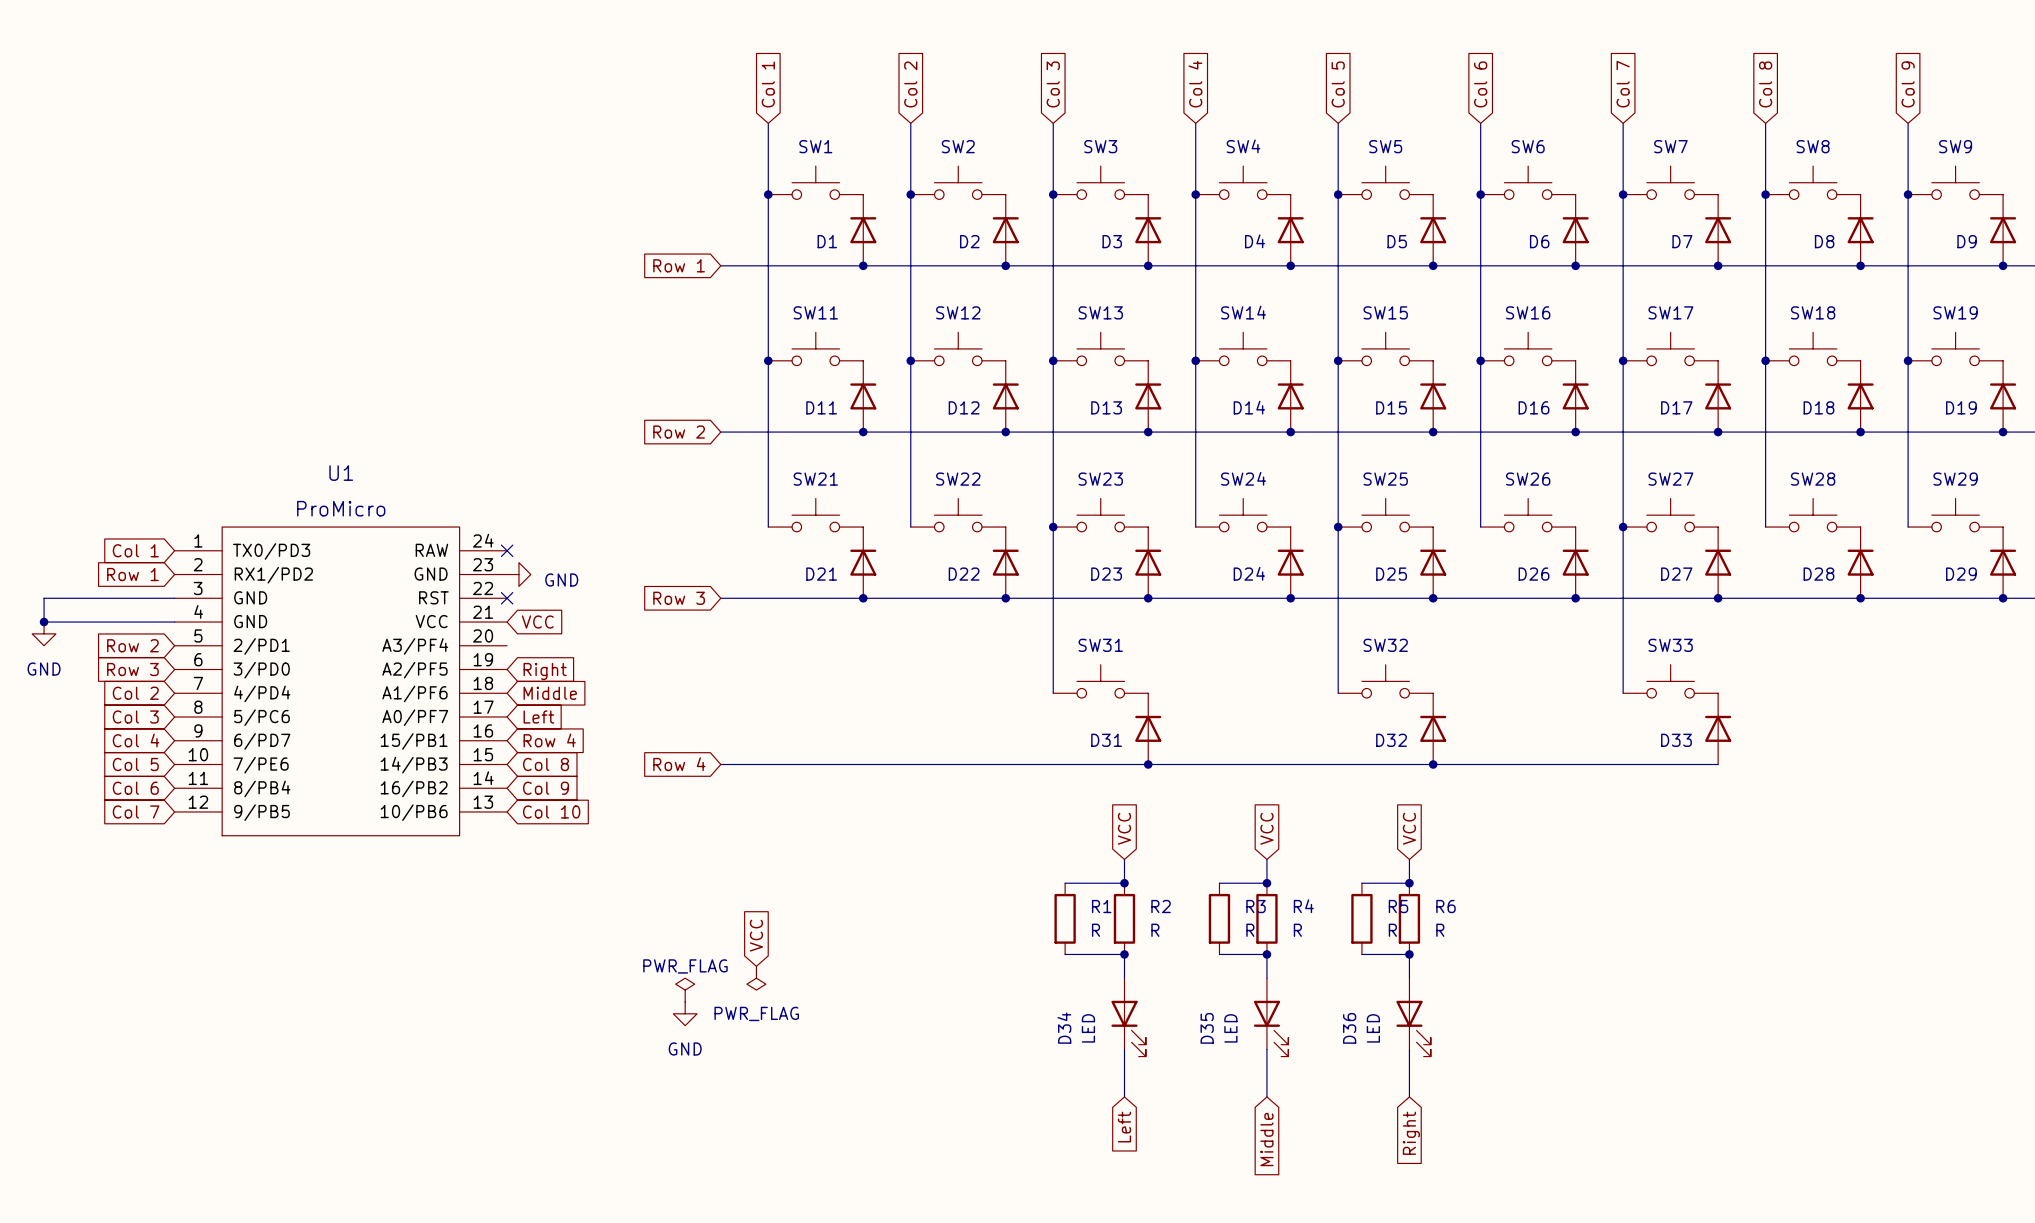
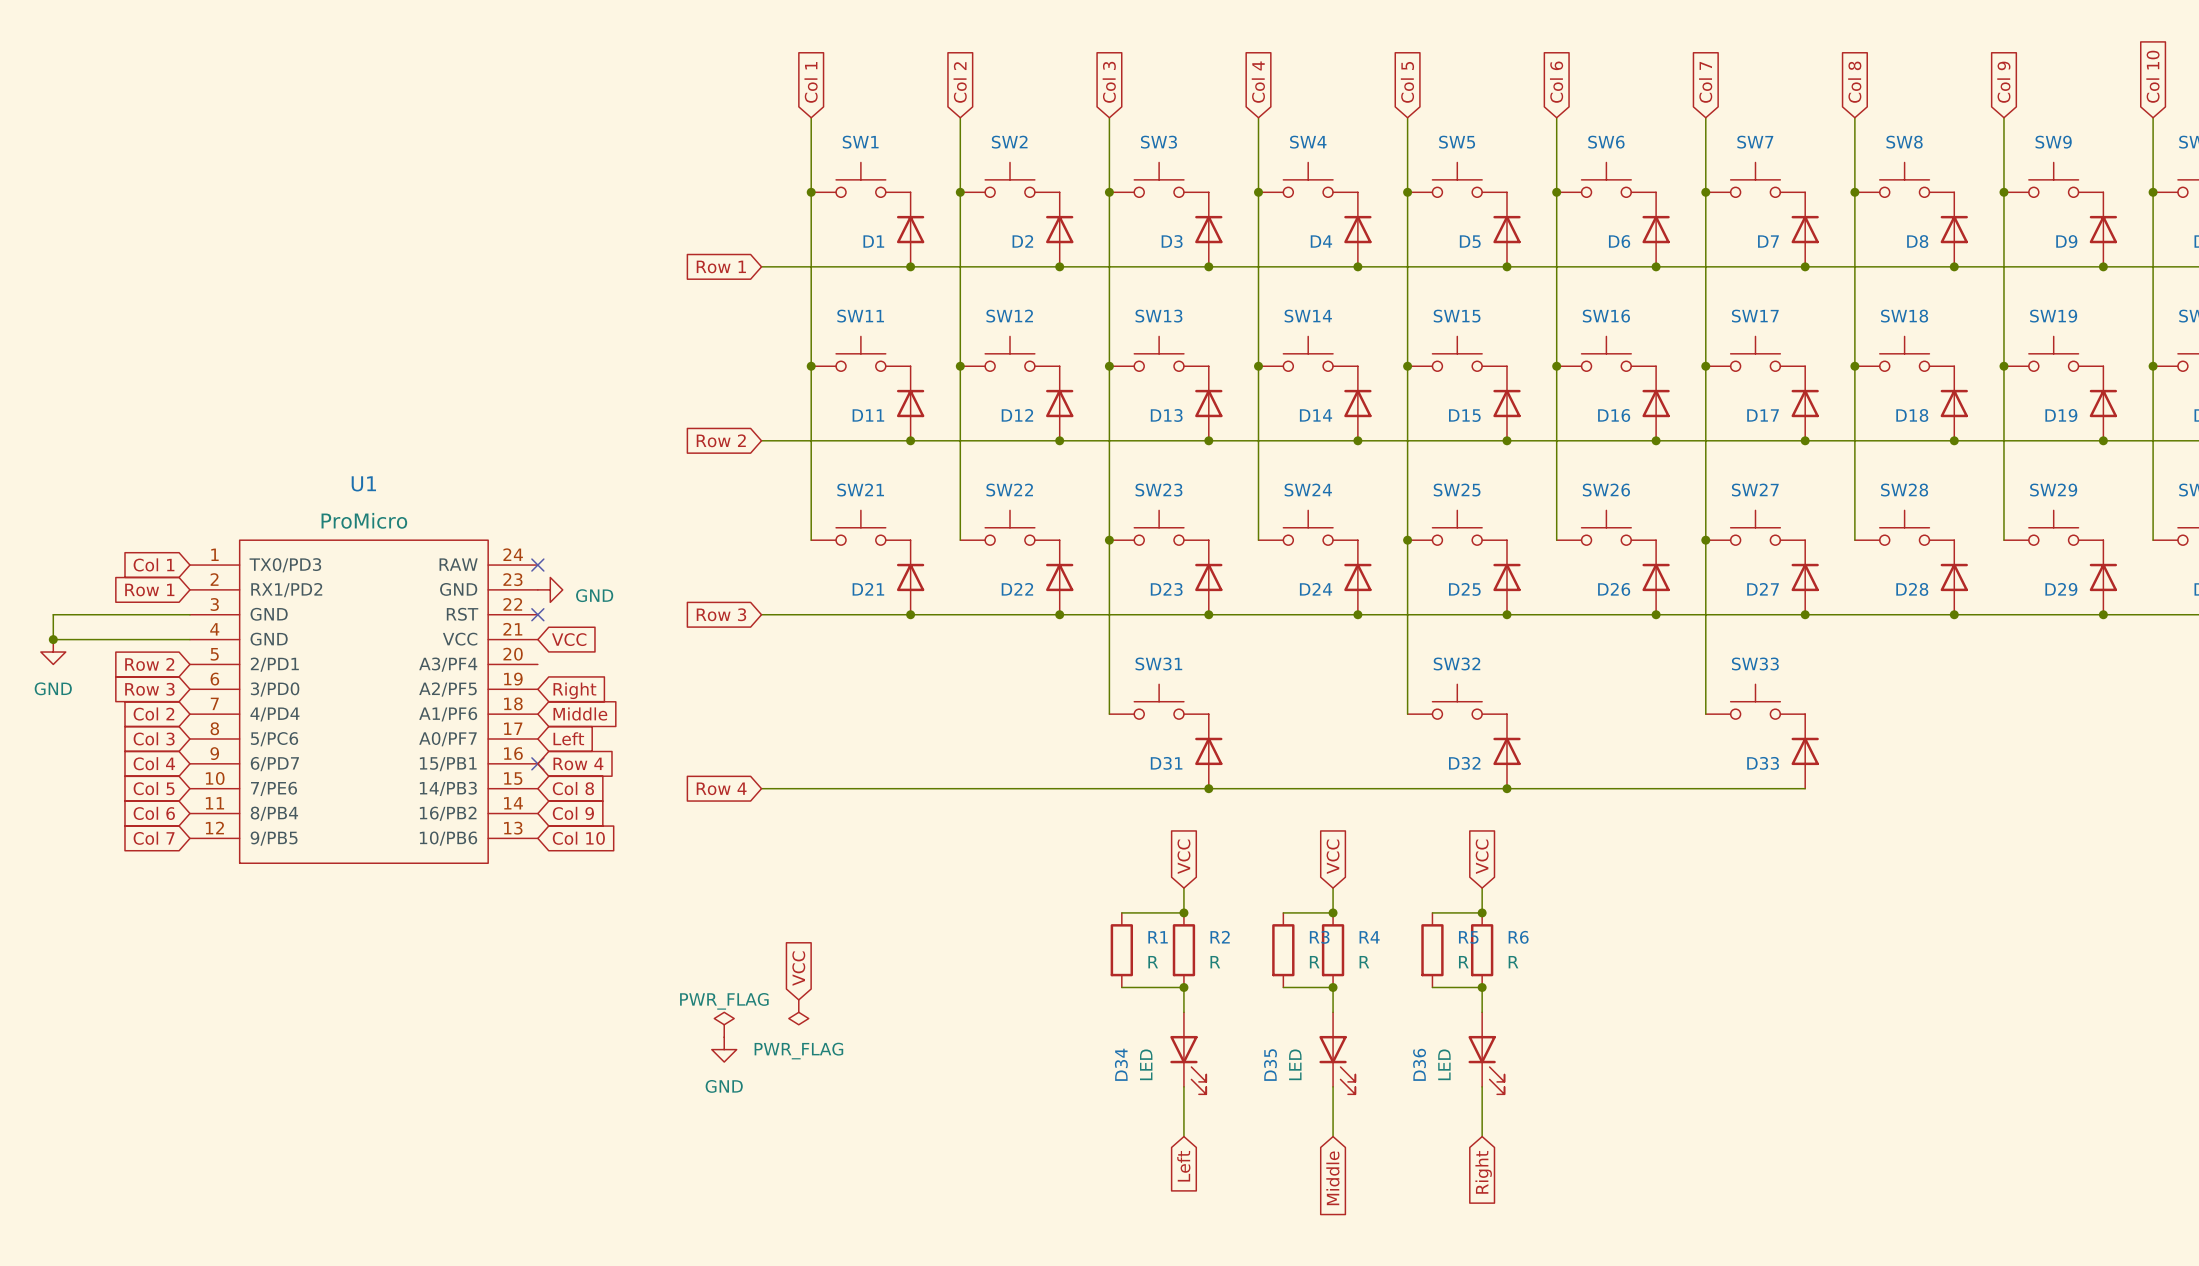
no-connect mark: none -> (537, 763)

